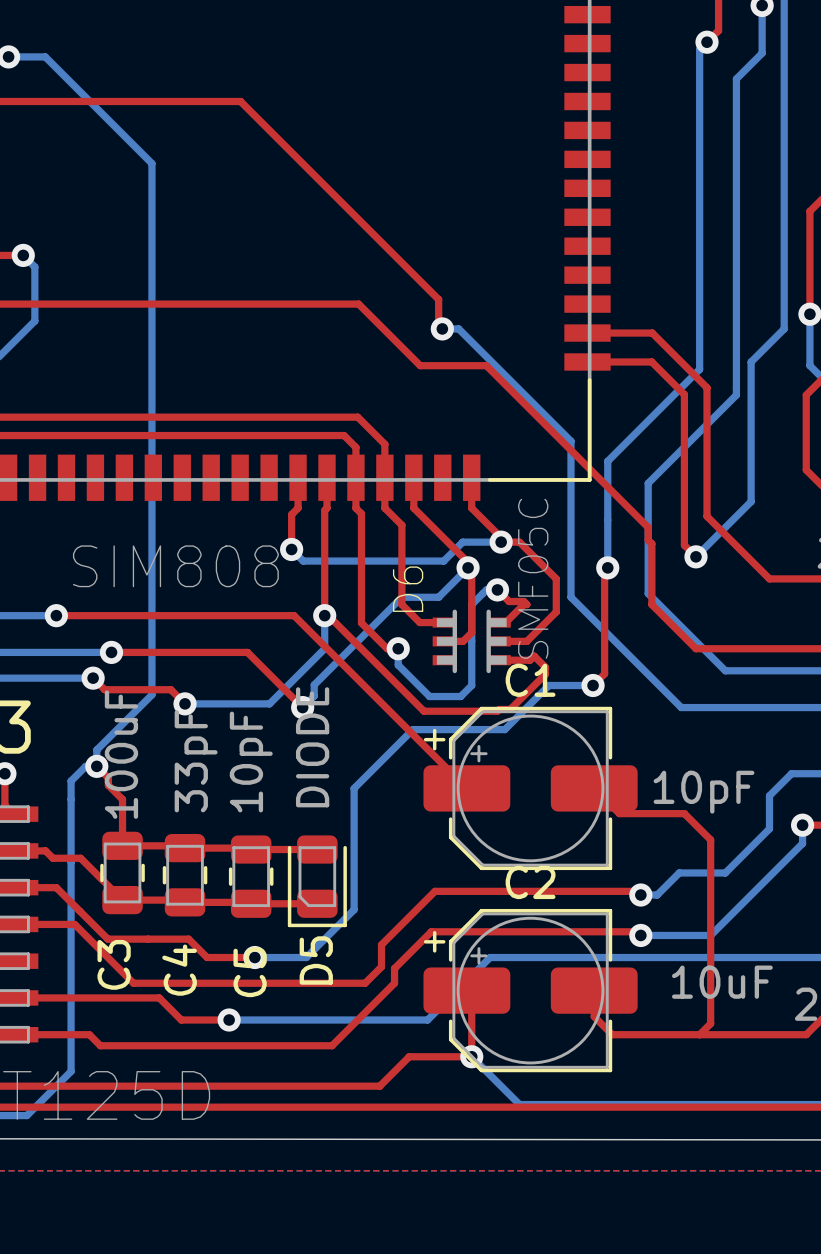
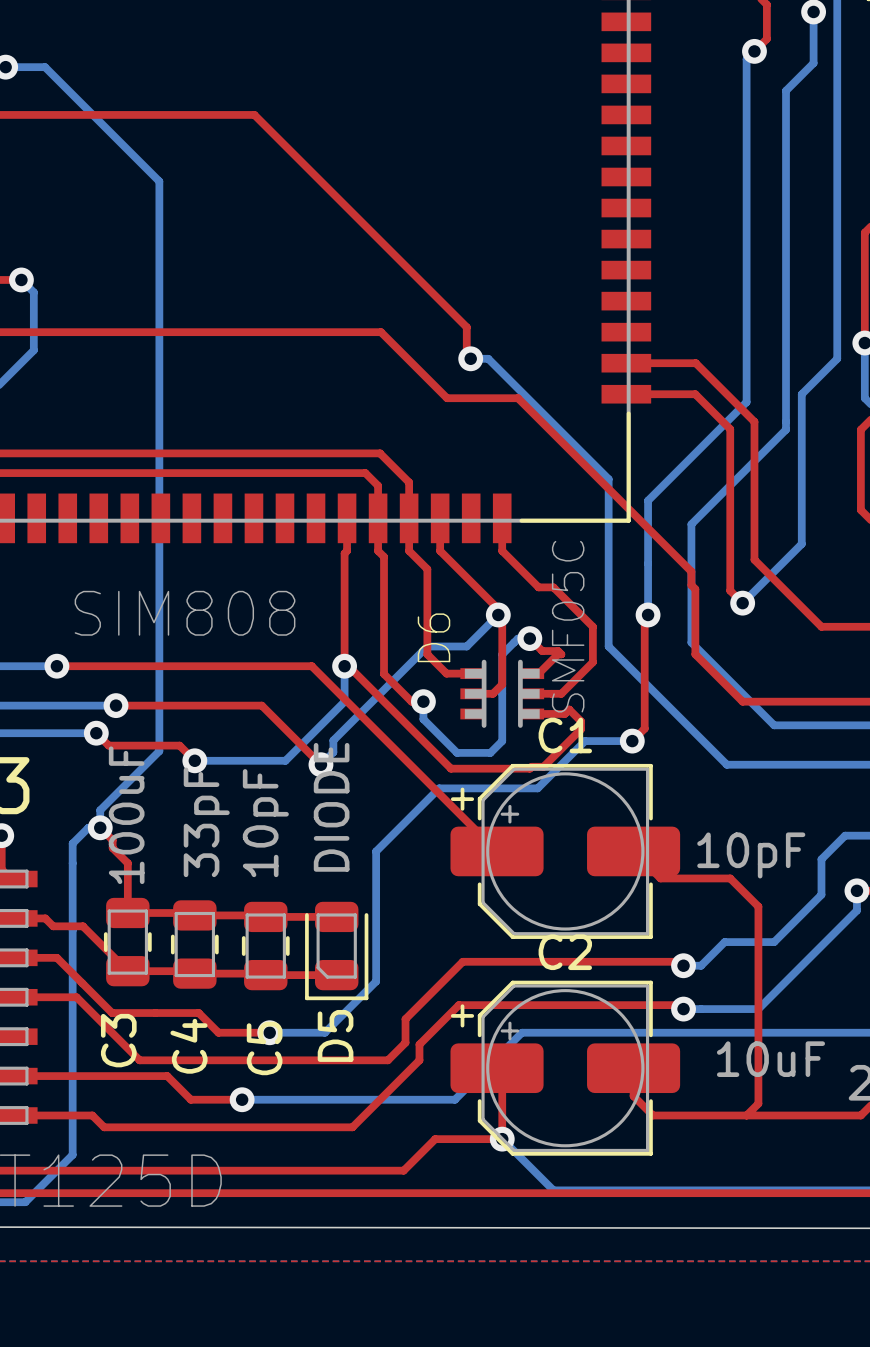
top track: (298, 477) (298, 508) (291, 514) (291, 549) -> none
bottom track: (501, 542) (462, 542) (443, 561) (303, 561) (291, 549) -> none
via: (501, 542) -> none
via: (291, 549) -> none

